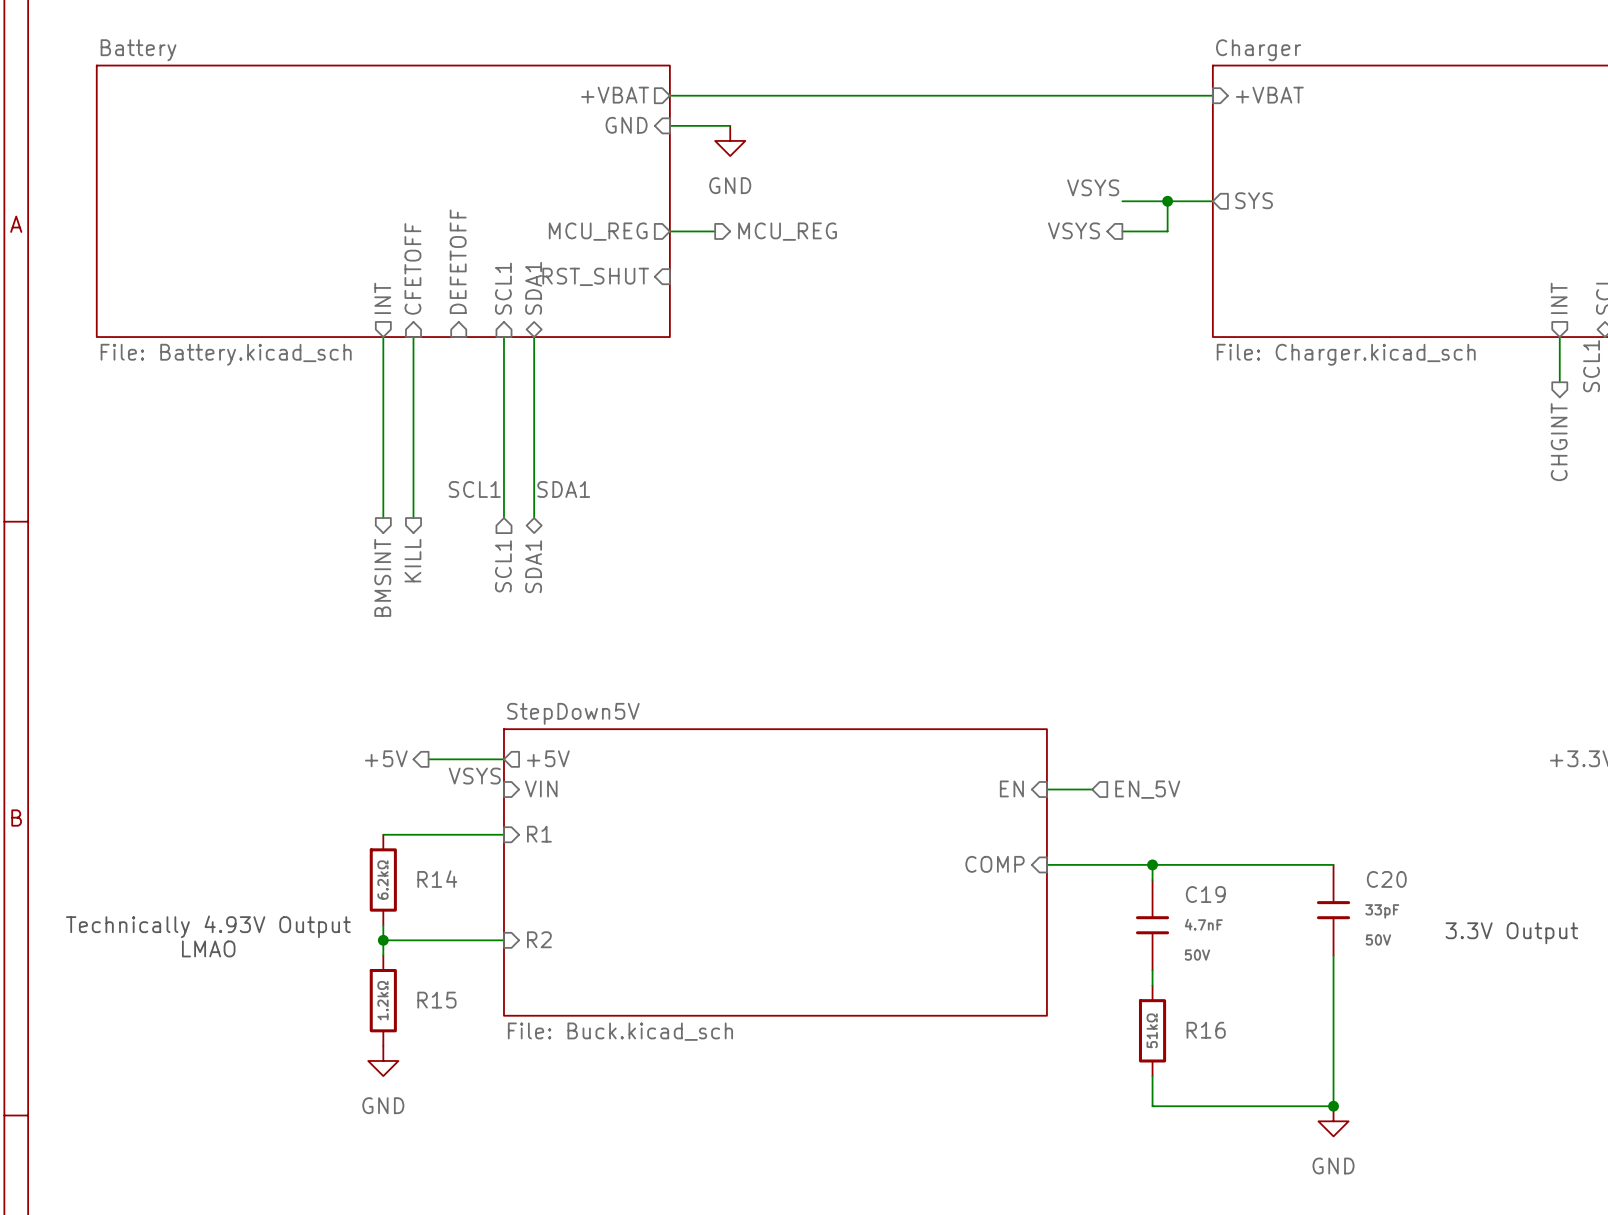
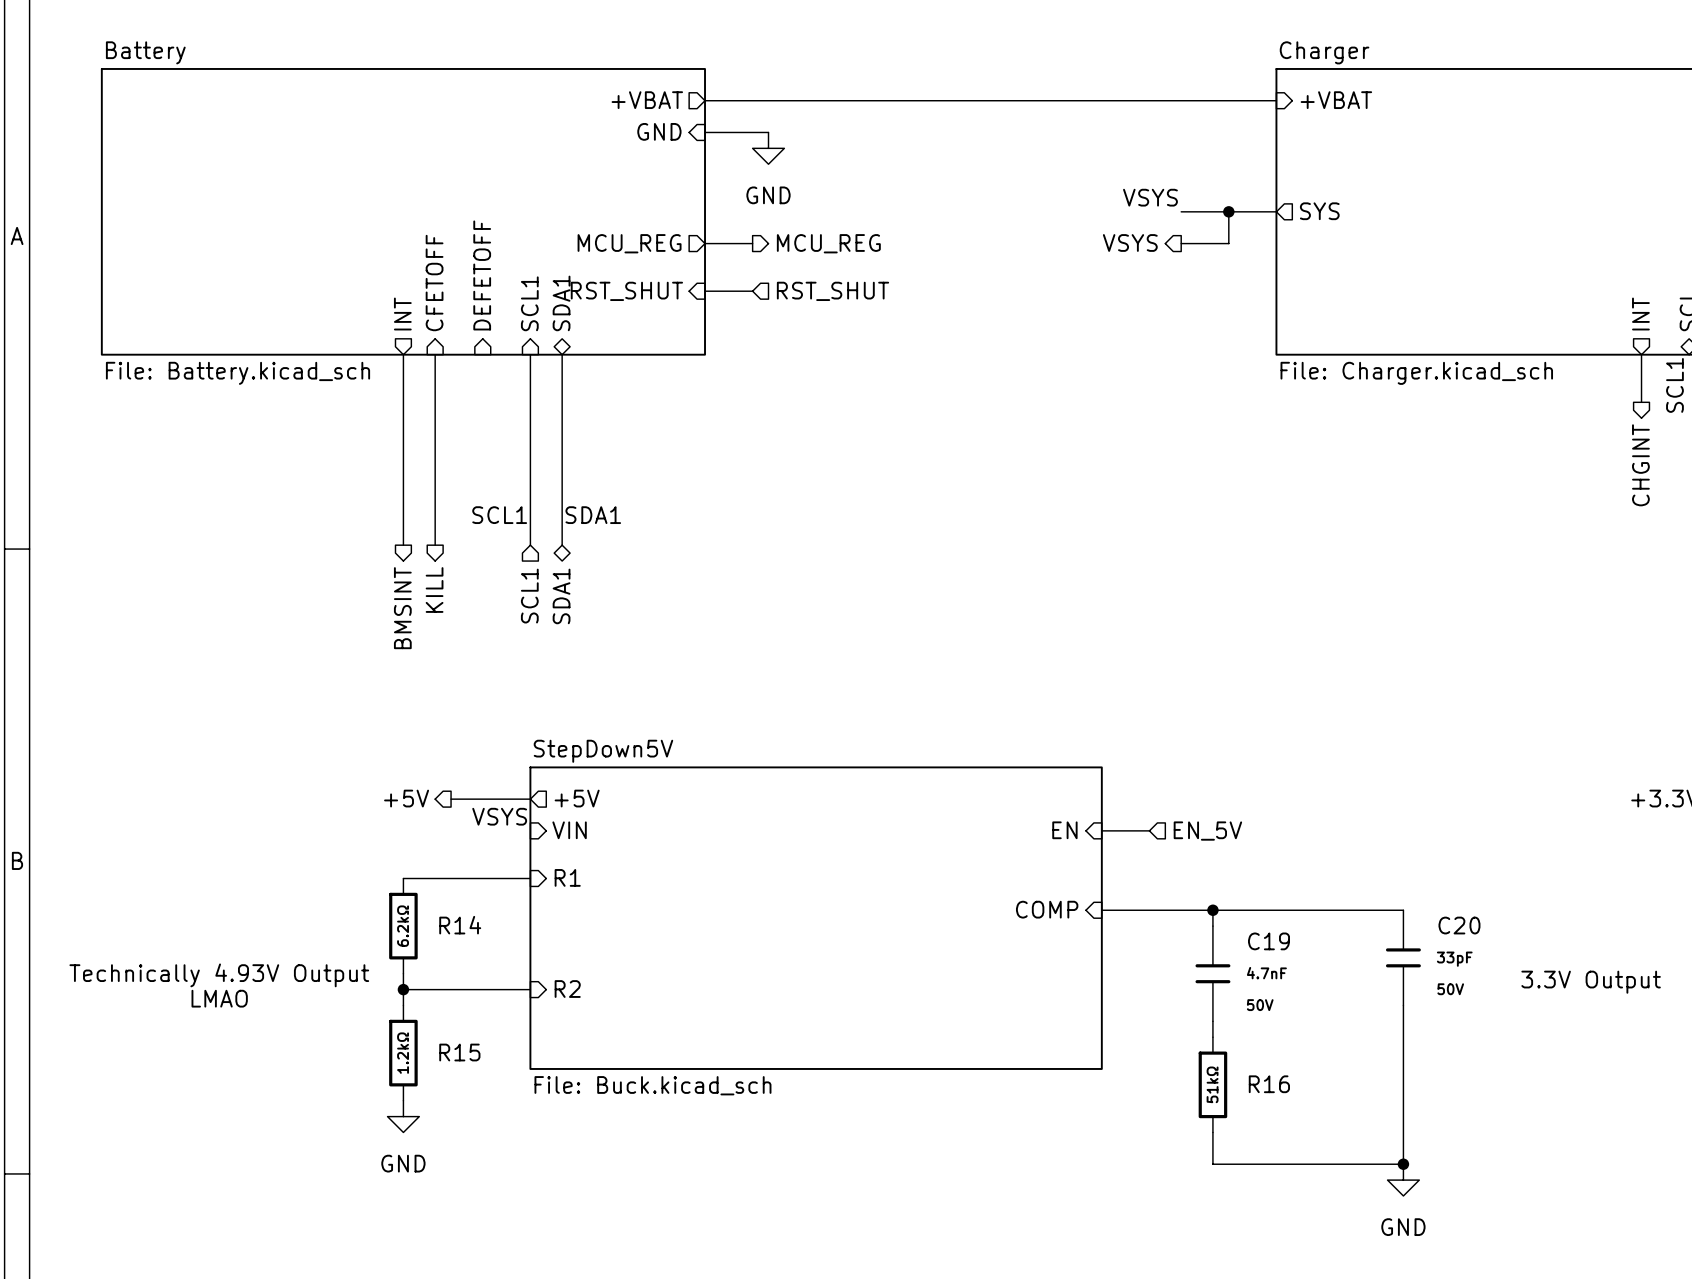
wire: none -> (705, 291) (752, 291)
hierarchical label: none -> RST_SHUT (832, 291)

